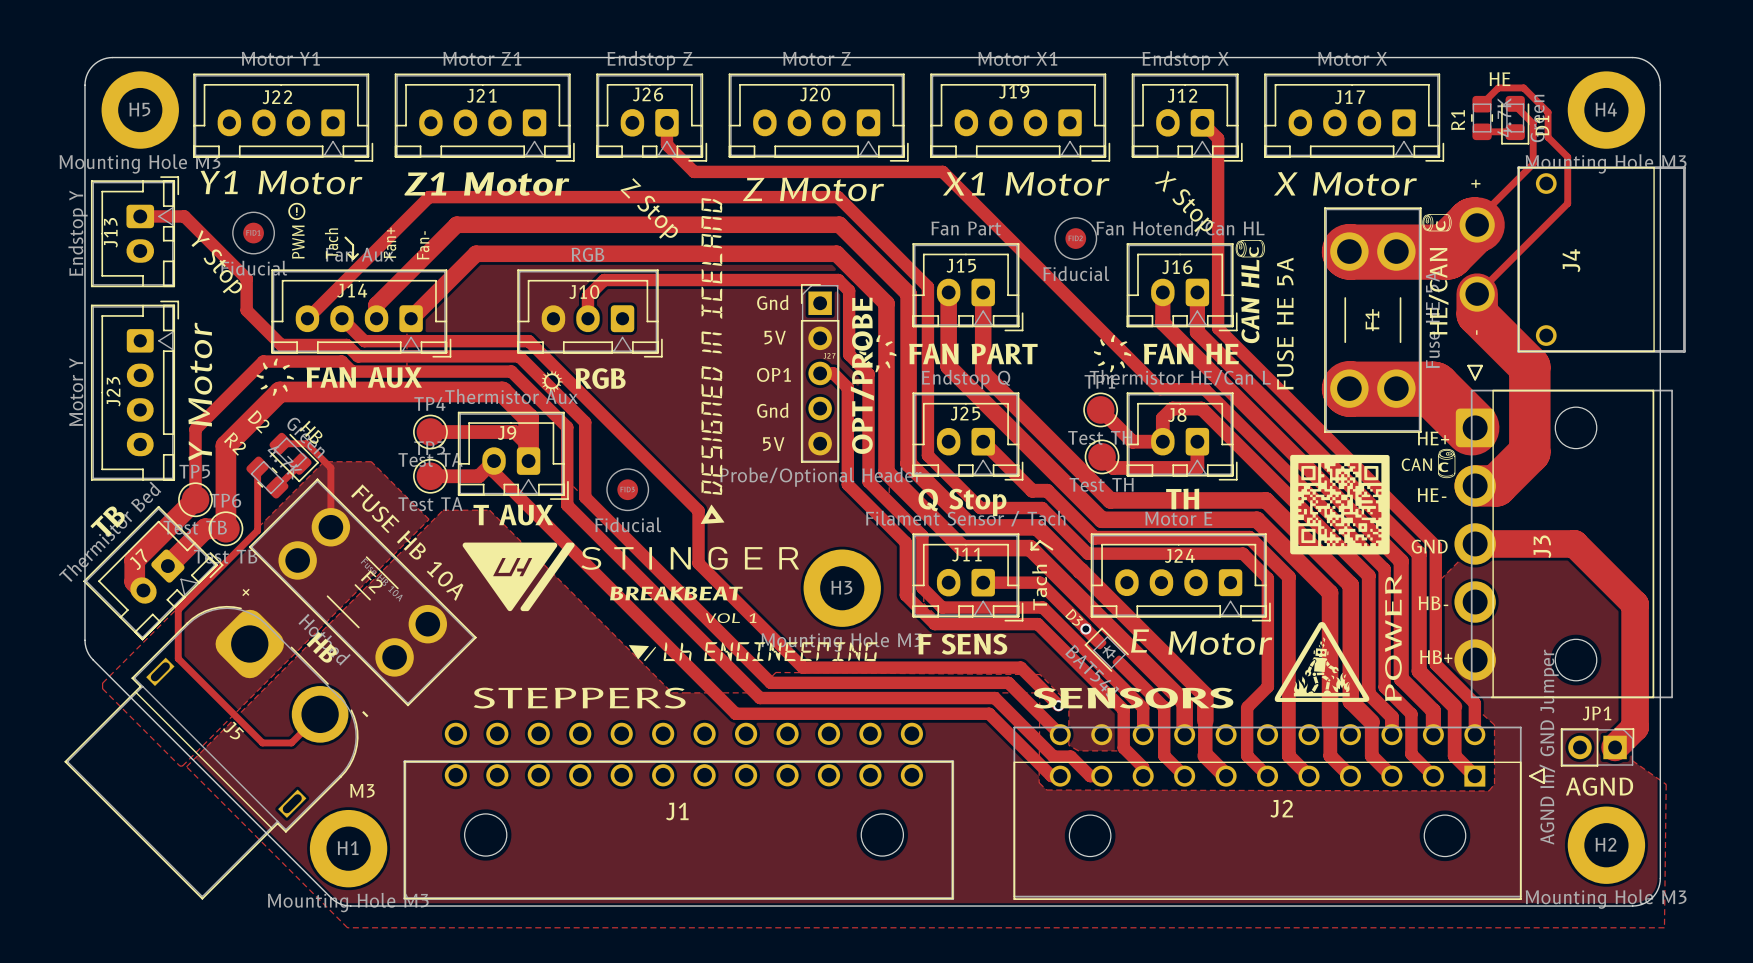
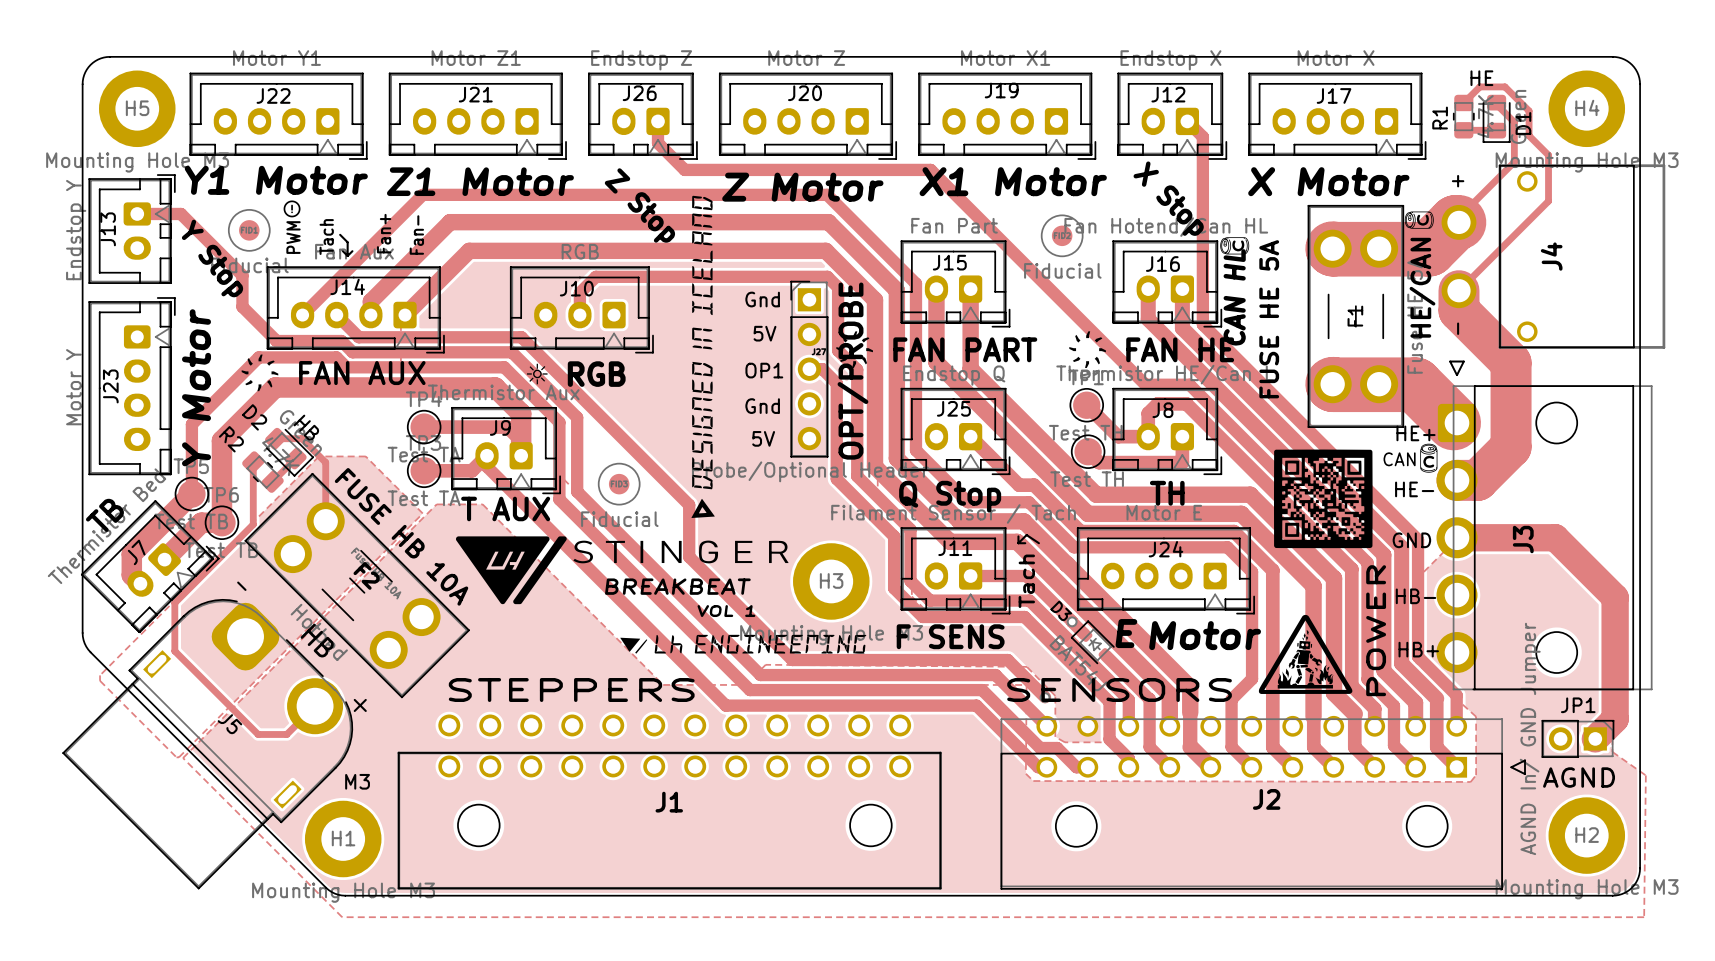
J5 text: + (245, 592) -> - (241, 586)
J5 text: - (365, 714) -> + (360, 705)

